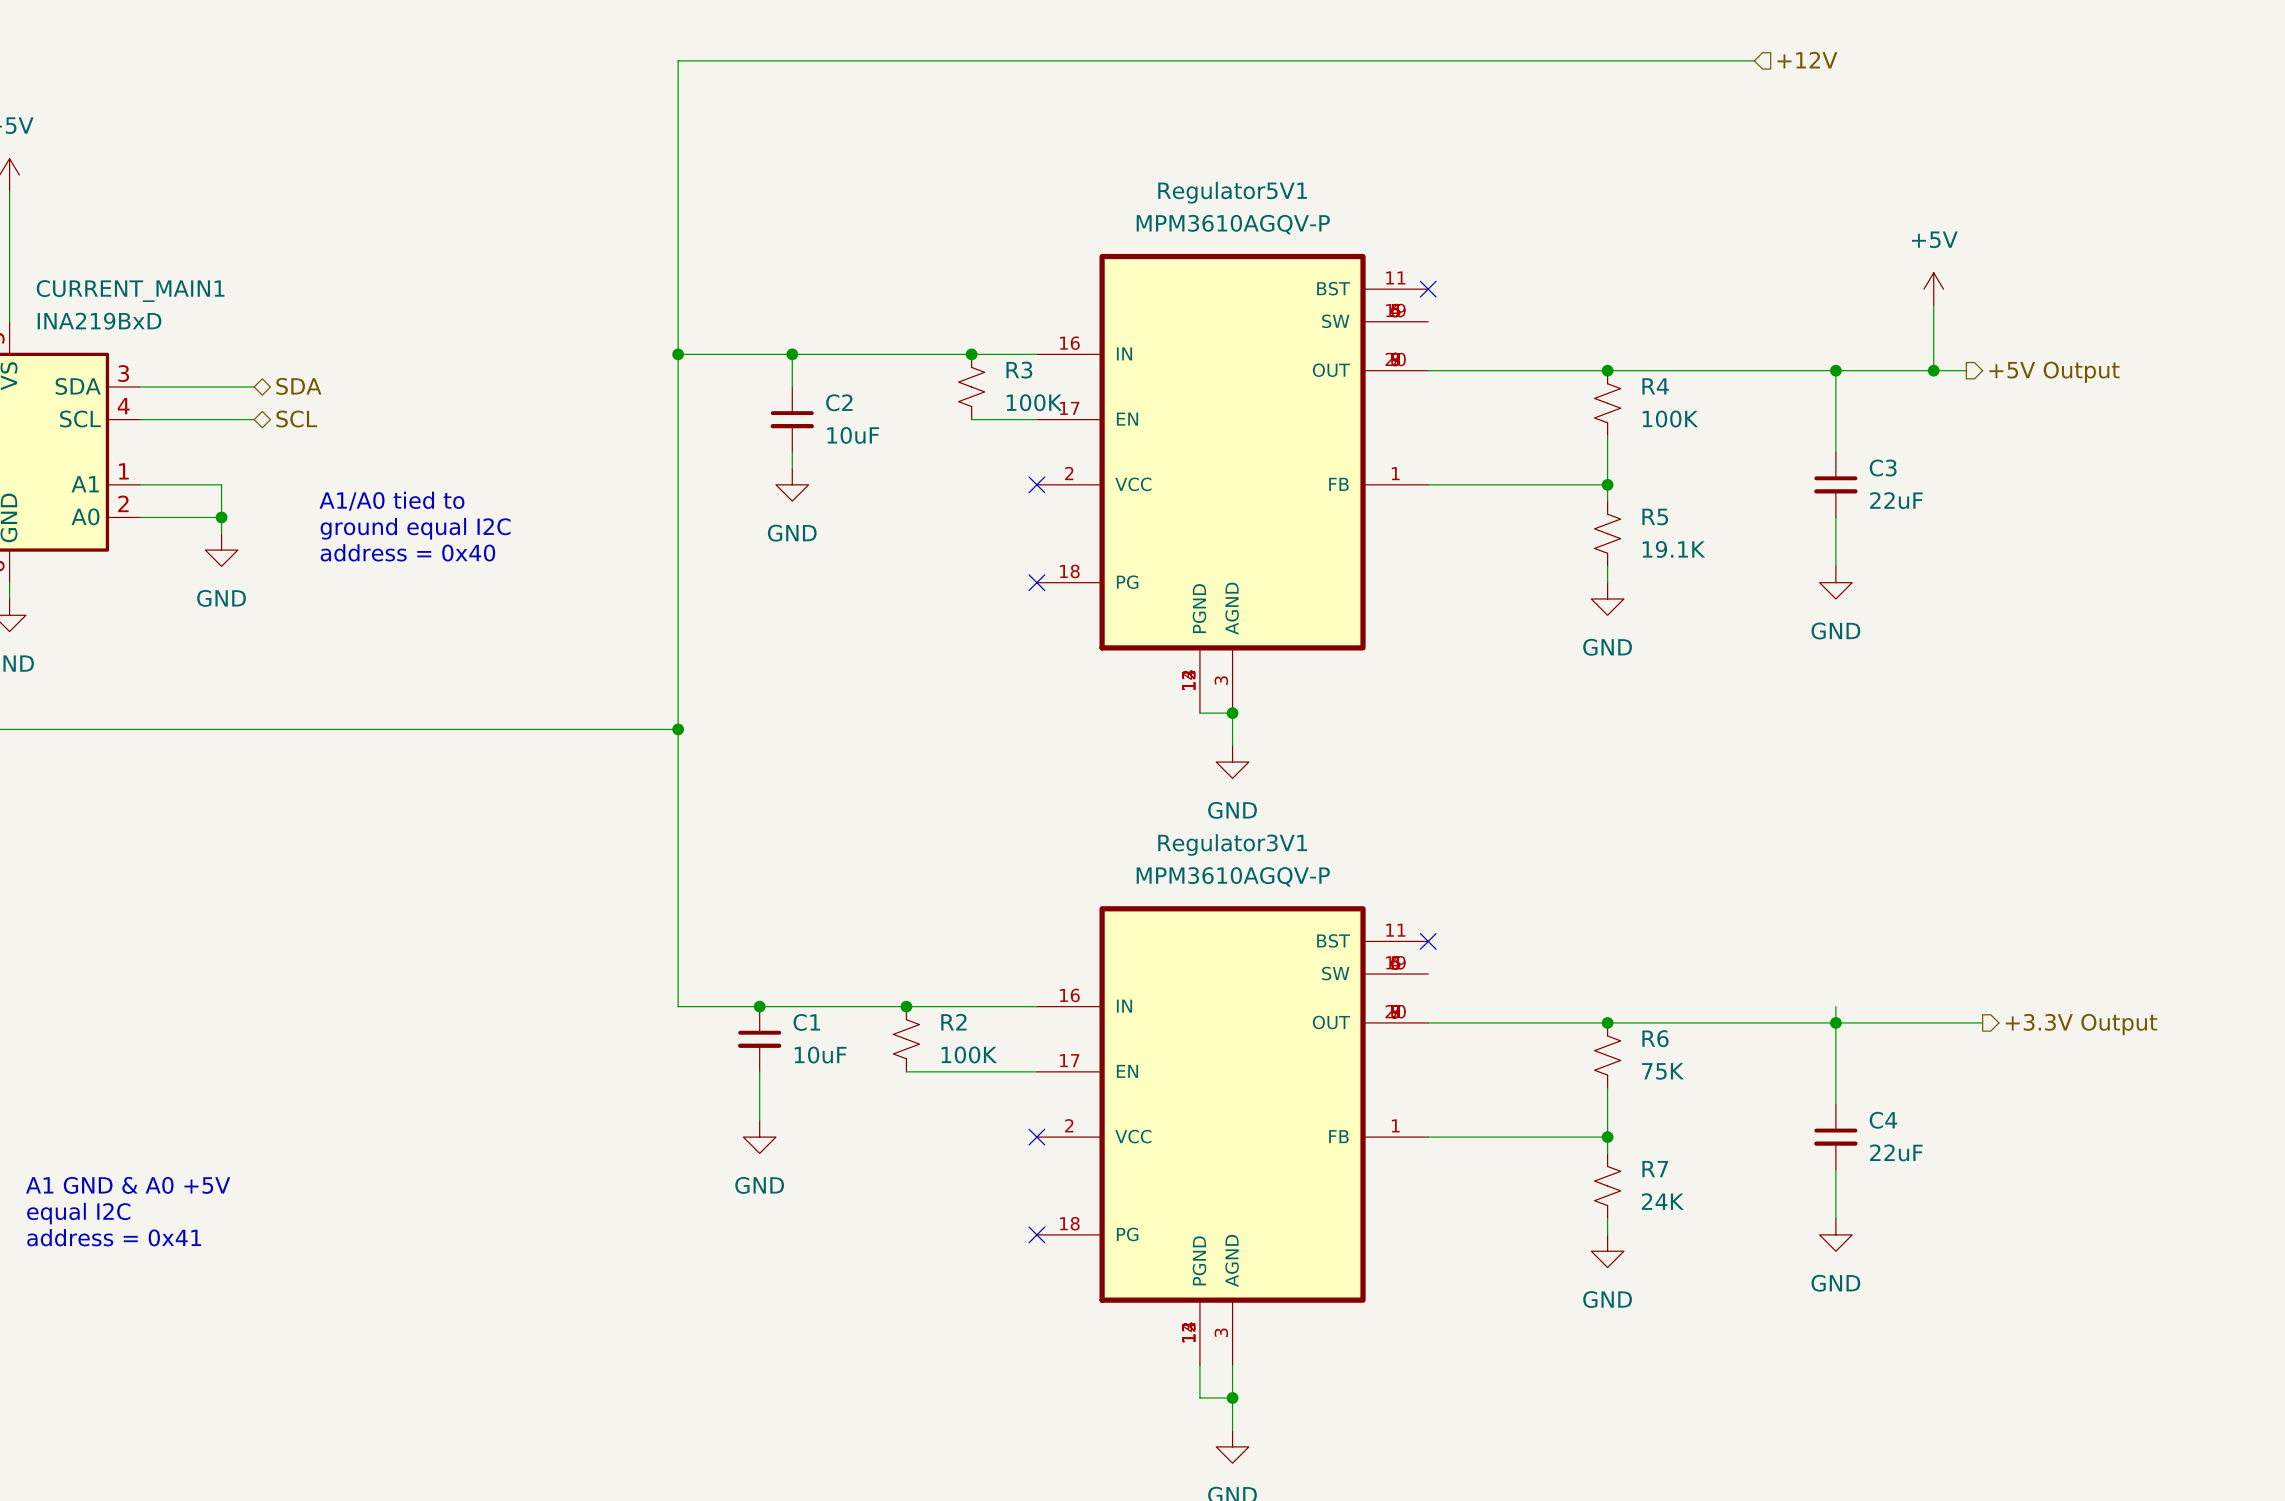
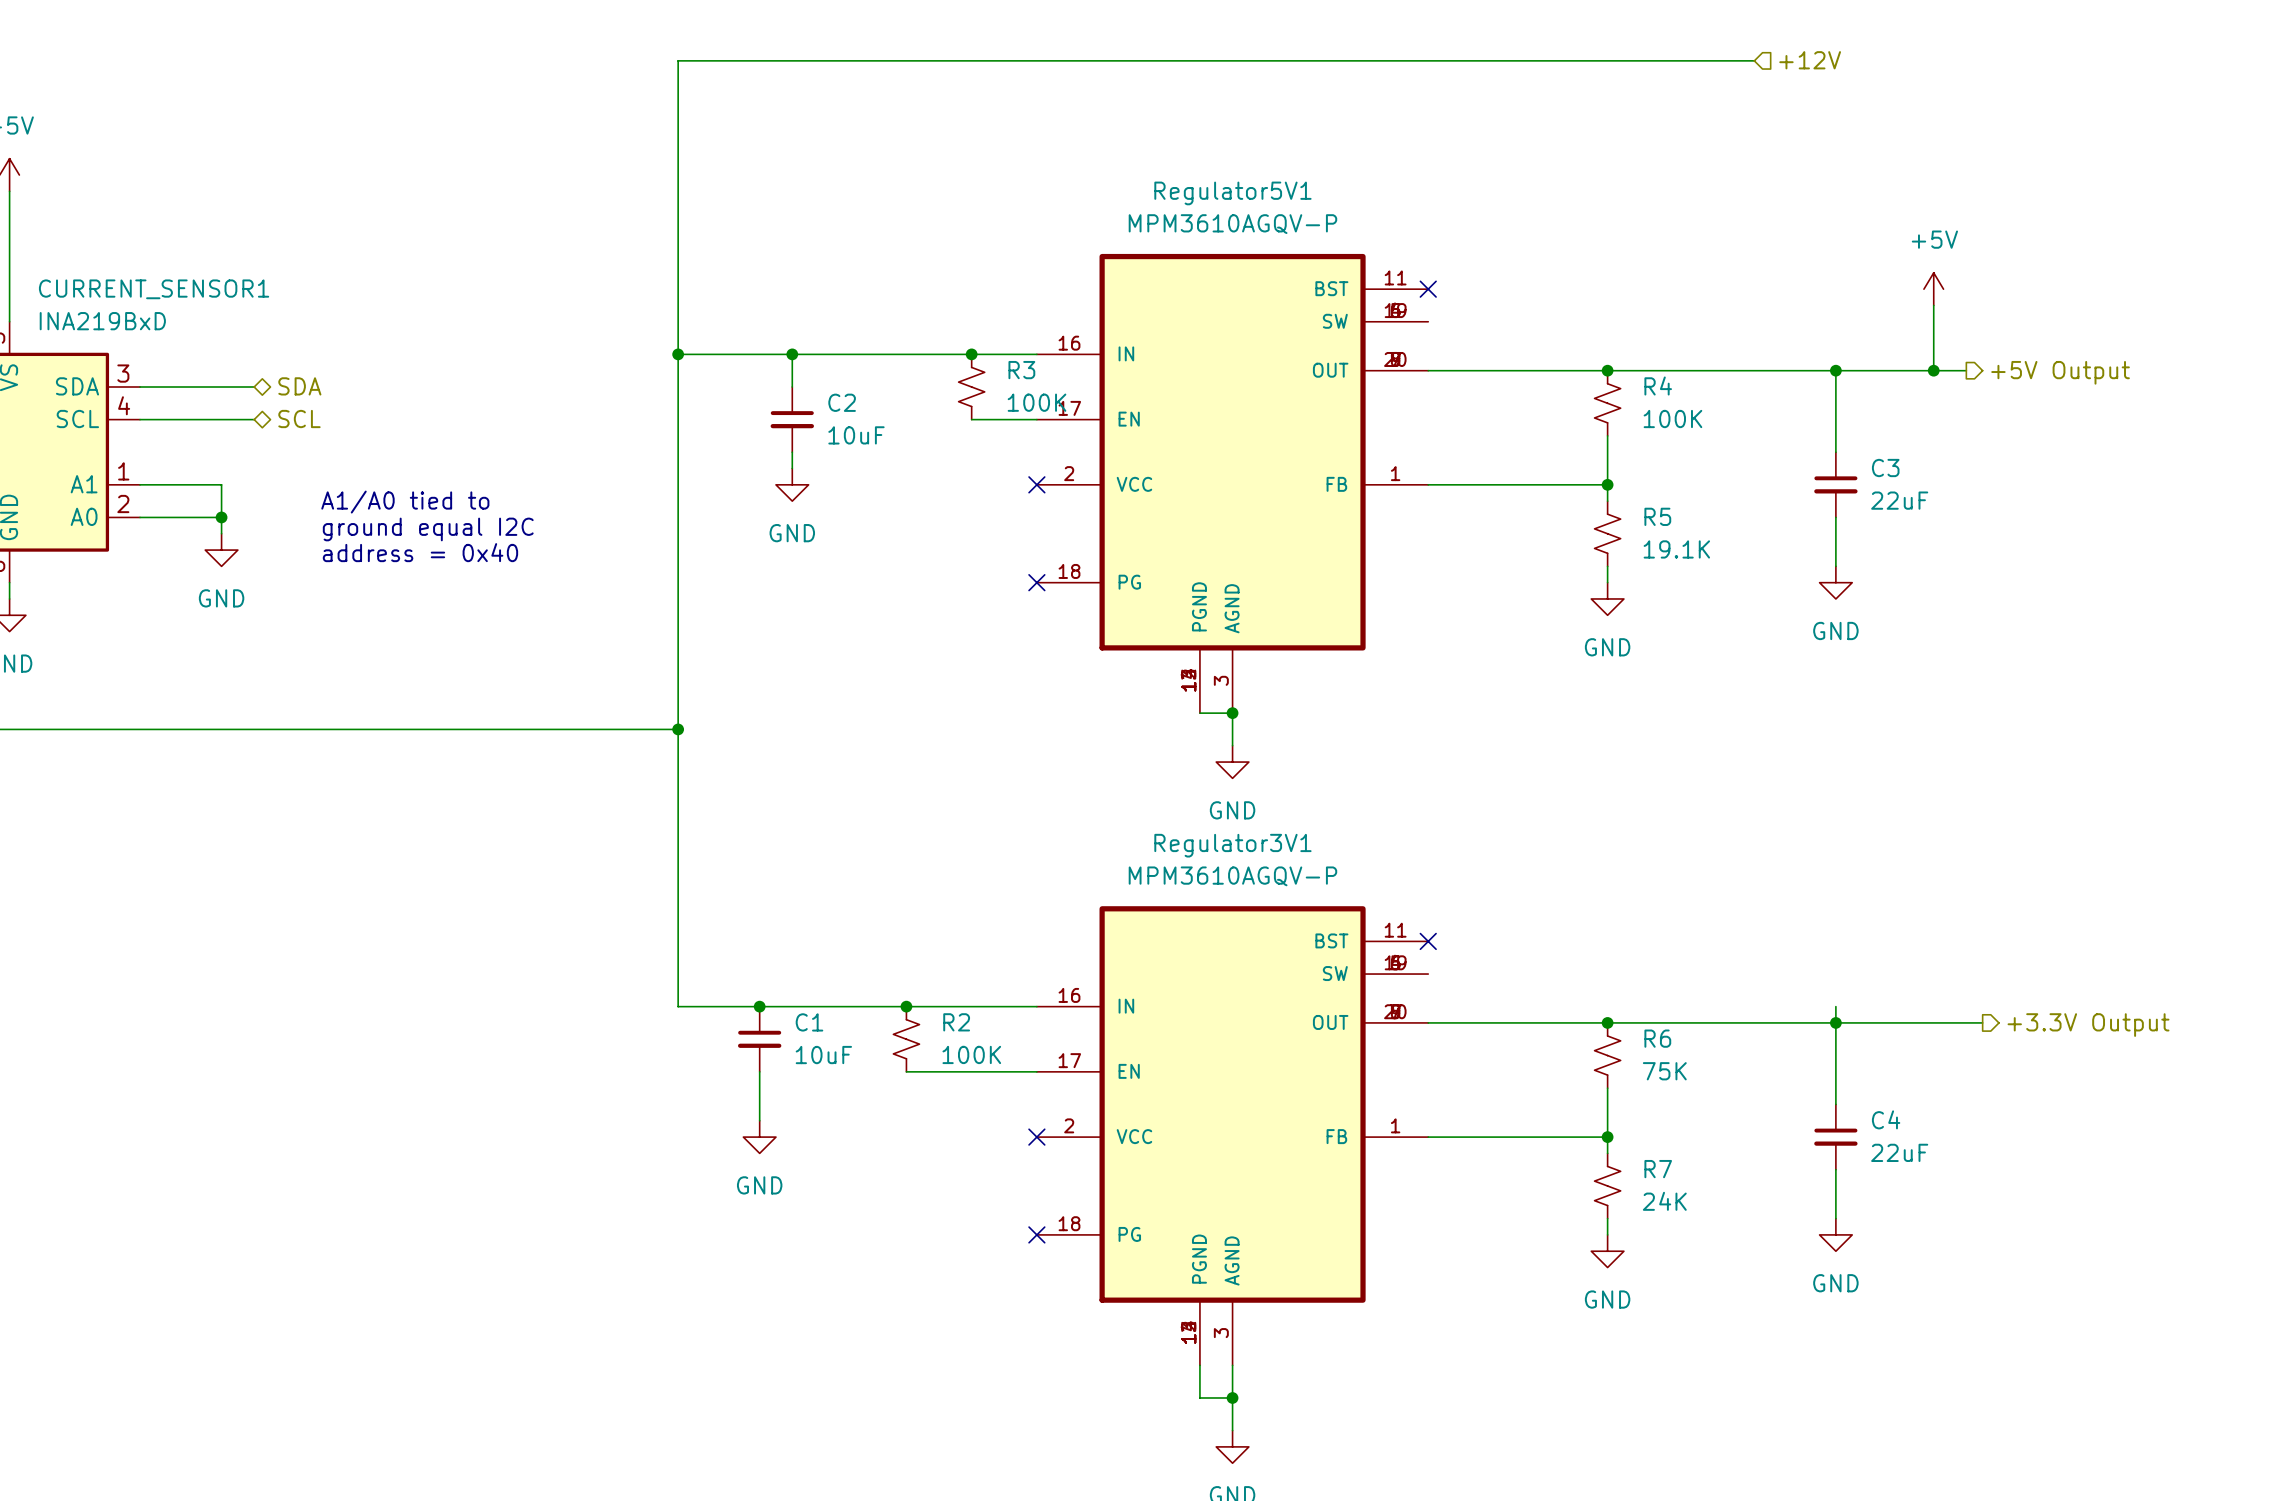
CURRENT_MAIN1 name: CURRENT_MAIN1 (130, 291) -> CURRENT_SENSOR1 (154, 289)
text: A1 GND & A0 +5V (128, 1185) -> none
text: equal I2C (78, 1213) -> none
text: address = 0x41 (114, 1237) -> none

